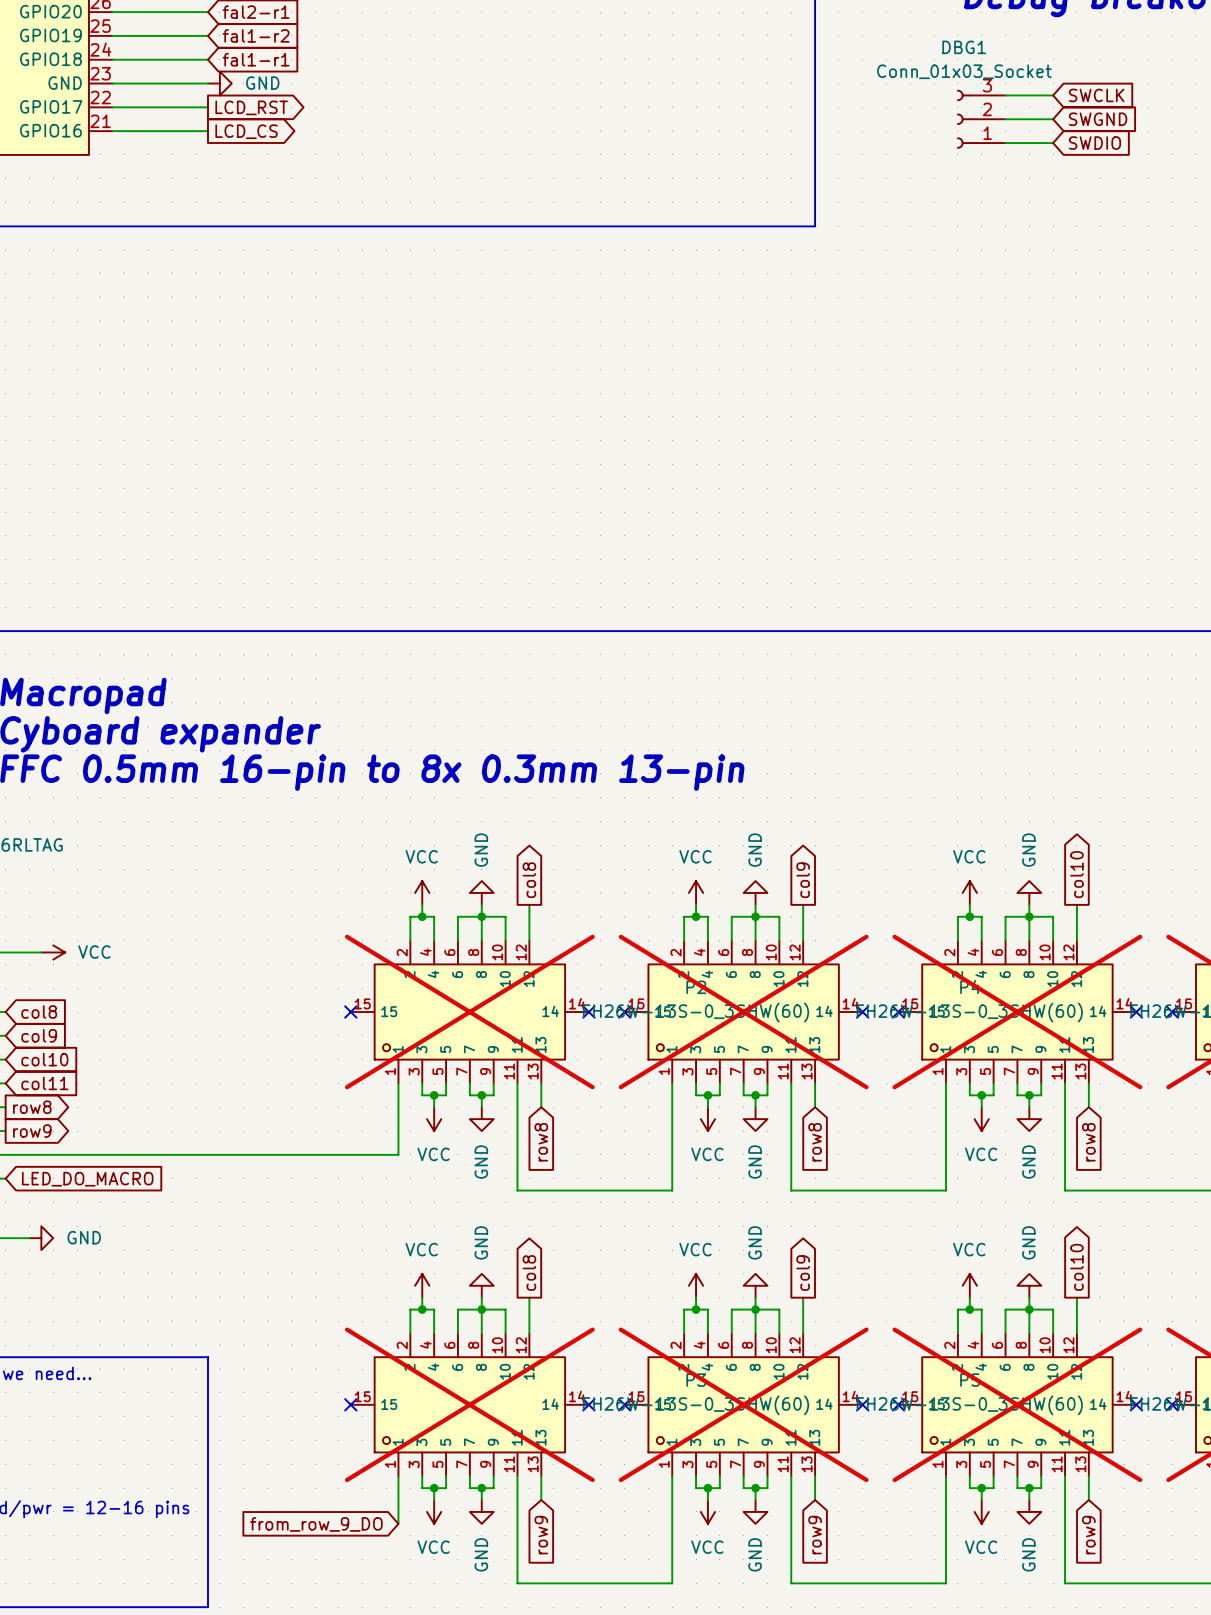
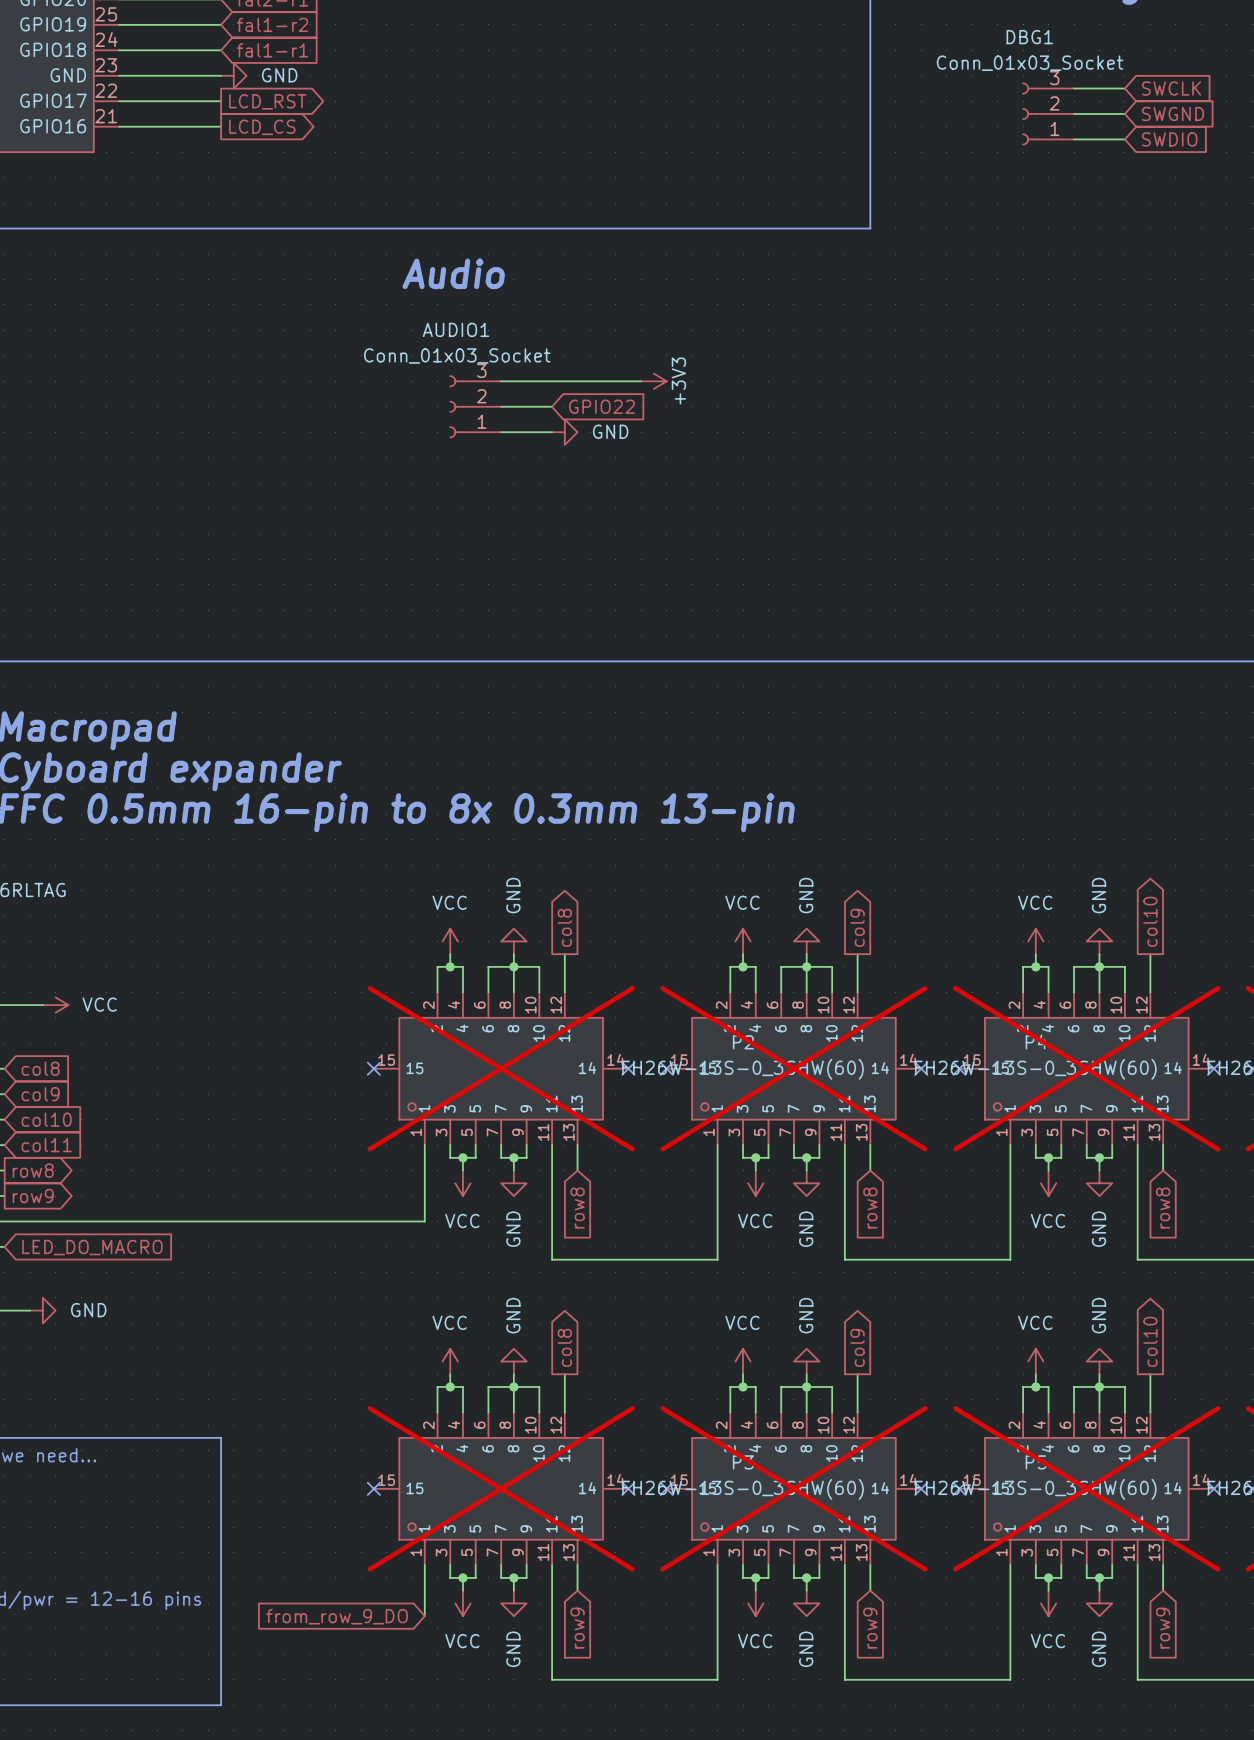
text: none -> Audio (453, 273)
wire: none -> (501, 381) (641, 381)
power symbol: none -> +3V3 (653, 381)
AUDIO1: none -> Conn_01x03_Socket (475, 406)
wire: none -> (501, 406) (552, 406)
global label: none -> GPIO22 (601, 406)
wire: none -> (501, 432) (552, 432)
power symbol: none -> GND (564, 432)

